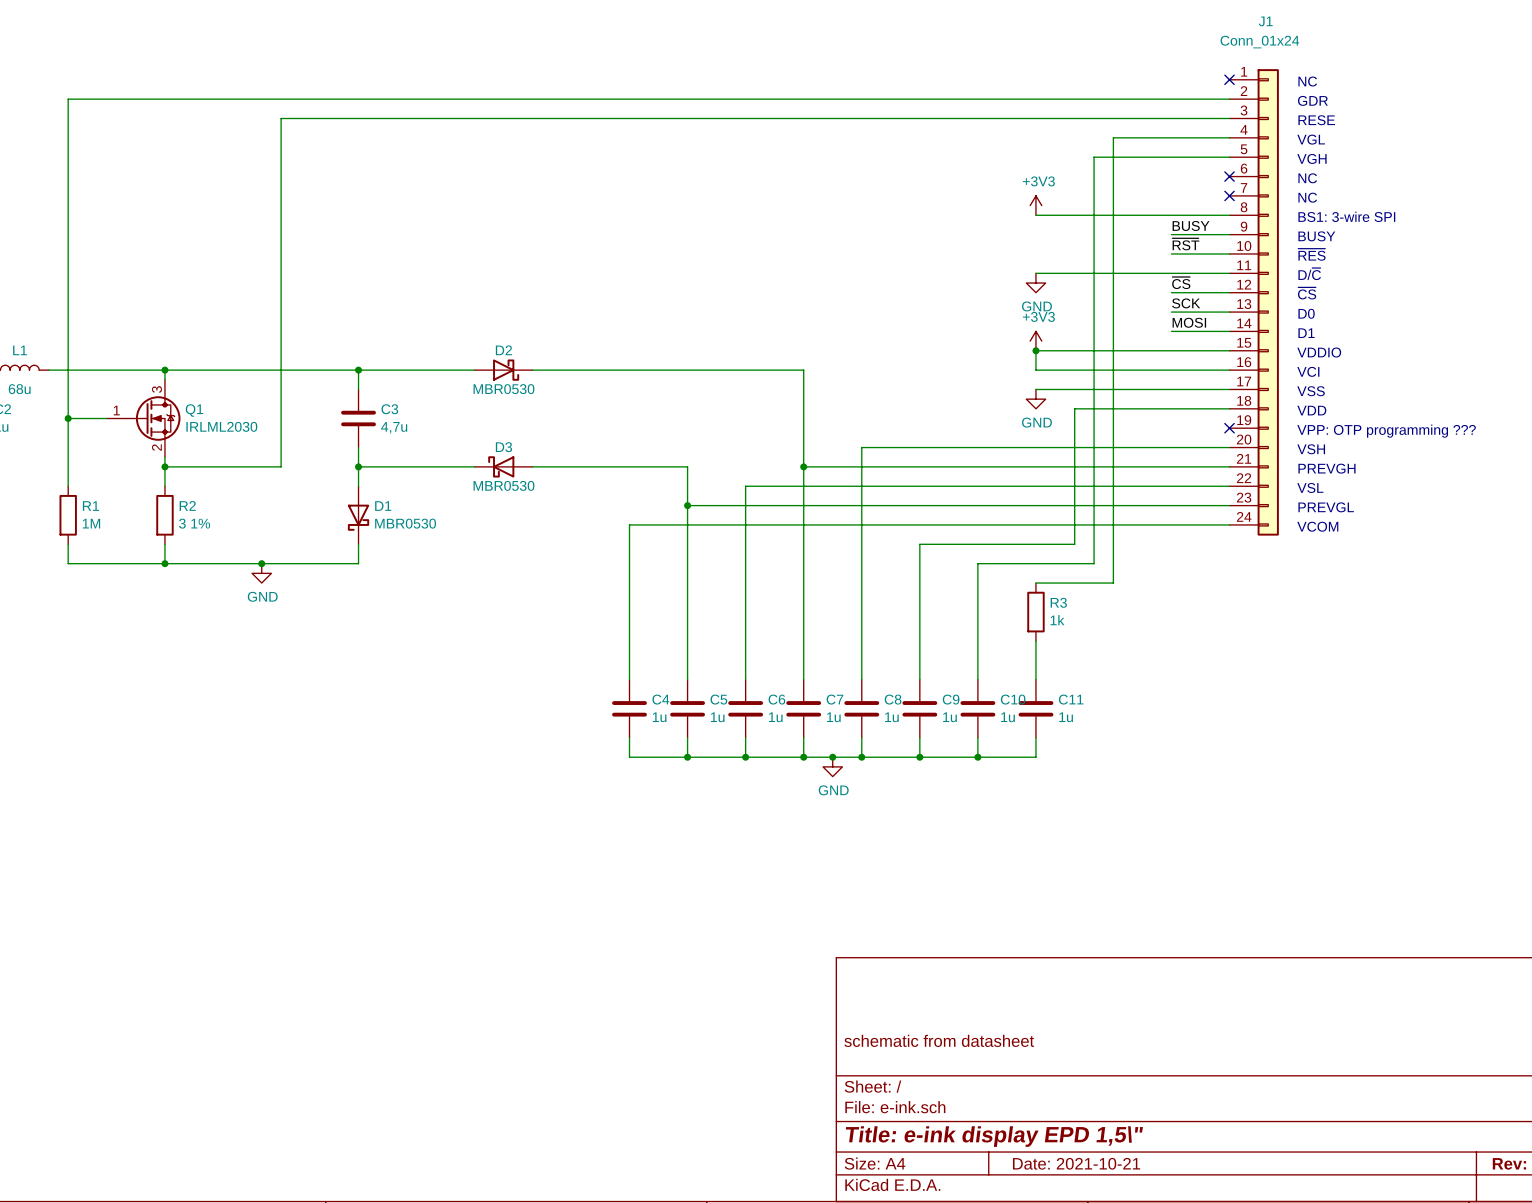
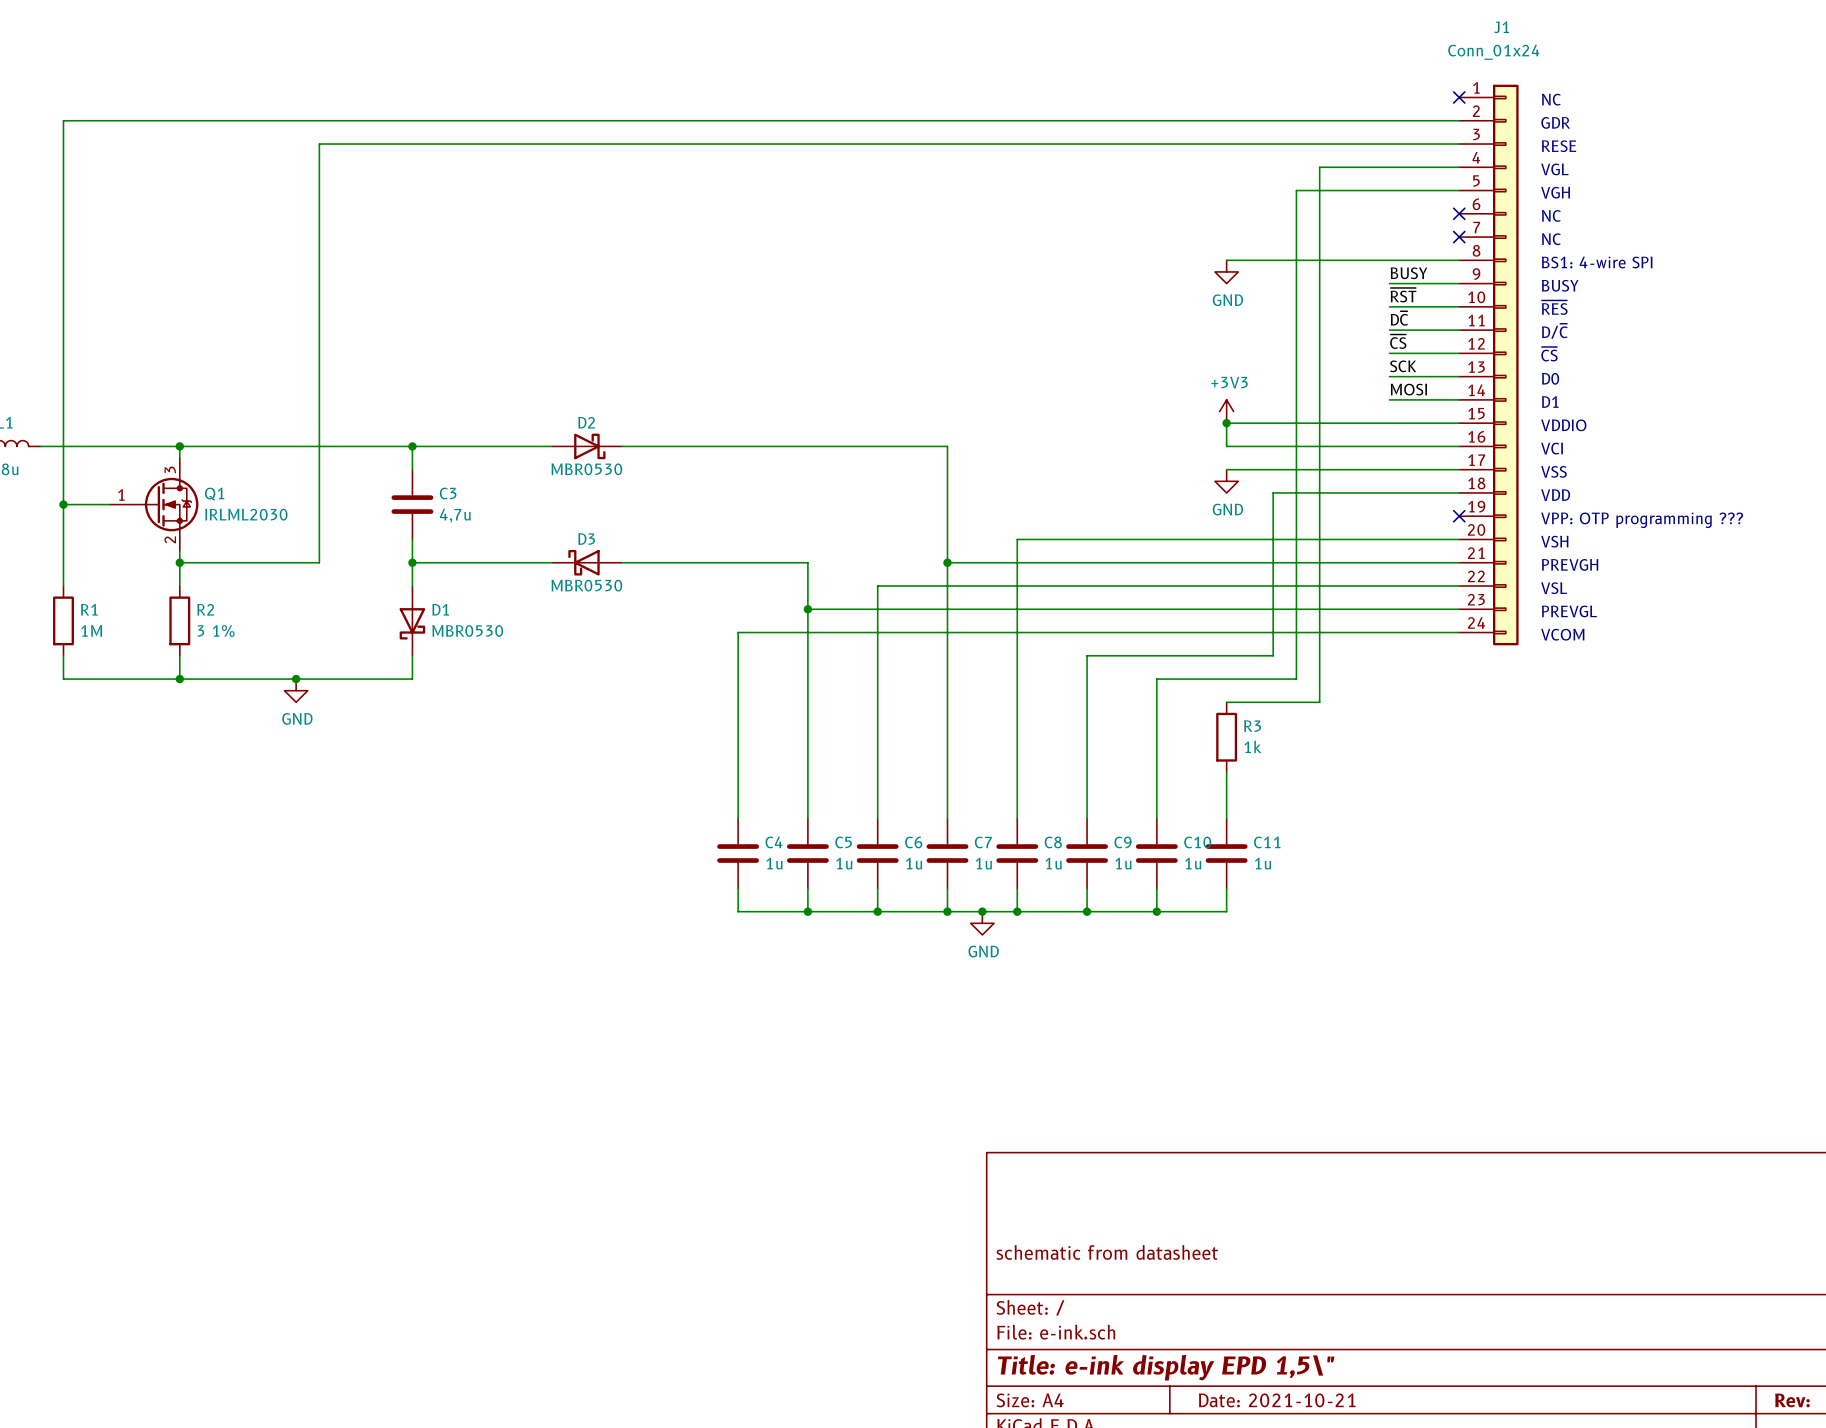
power symbol: +3V3 (1035, 205) -> none
text: BS1: 3-wire SPI (1346, 216) -> BS1: 4-wire SPI (1597, 262)
label: none -> D~{C} (1399, 318)
wire: (1035, 273) (1171, 273) -> none
power symbol position: GND (1035, 283) -> GND (1226, 271)

